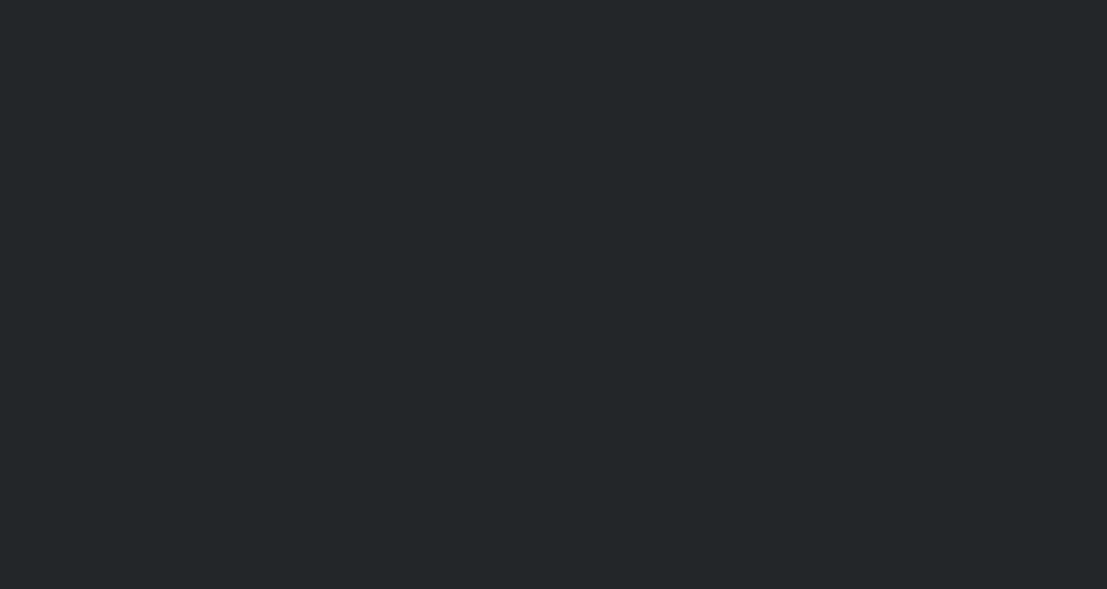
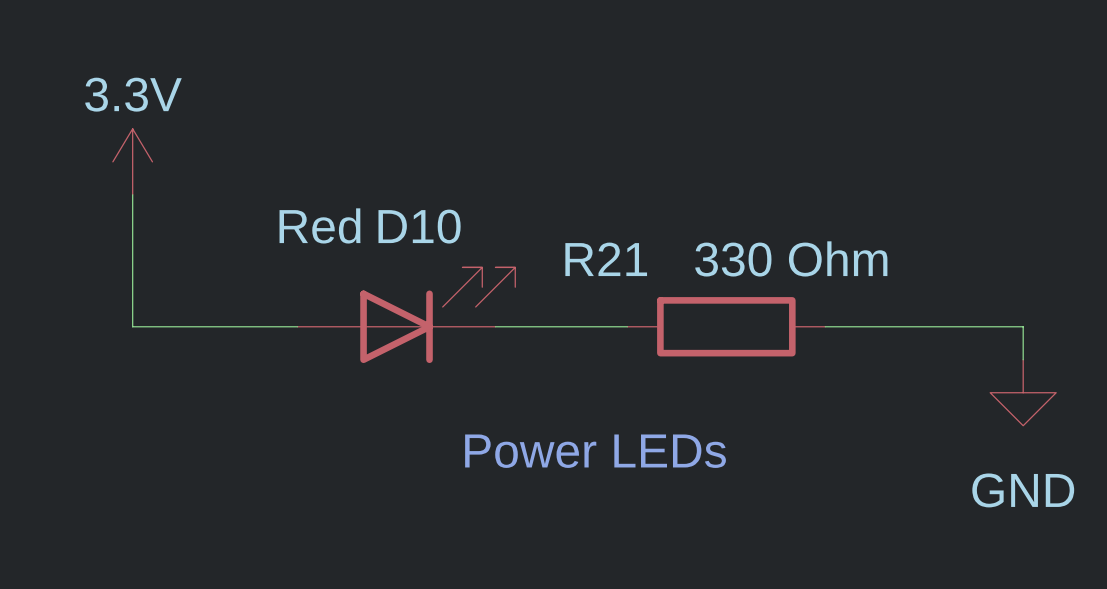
power symbol: none -> 3.3V (132, 161)
wire: none -> (132, 194) (132, 326) (297, 326)
D10: none -> Red (406, 315)
wire: none -> (495, 326) (627, 326)
R21: none -> 330 Ohm (726, 326)
wire: none -> (825, 326) (1023, 326) (1023, 359)
power symbol: none -> GND (1023, 392)
text: none -> Power LEDs (595, 451)

